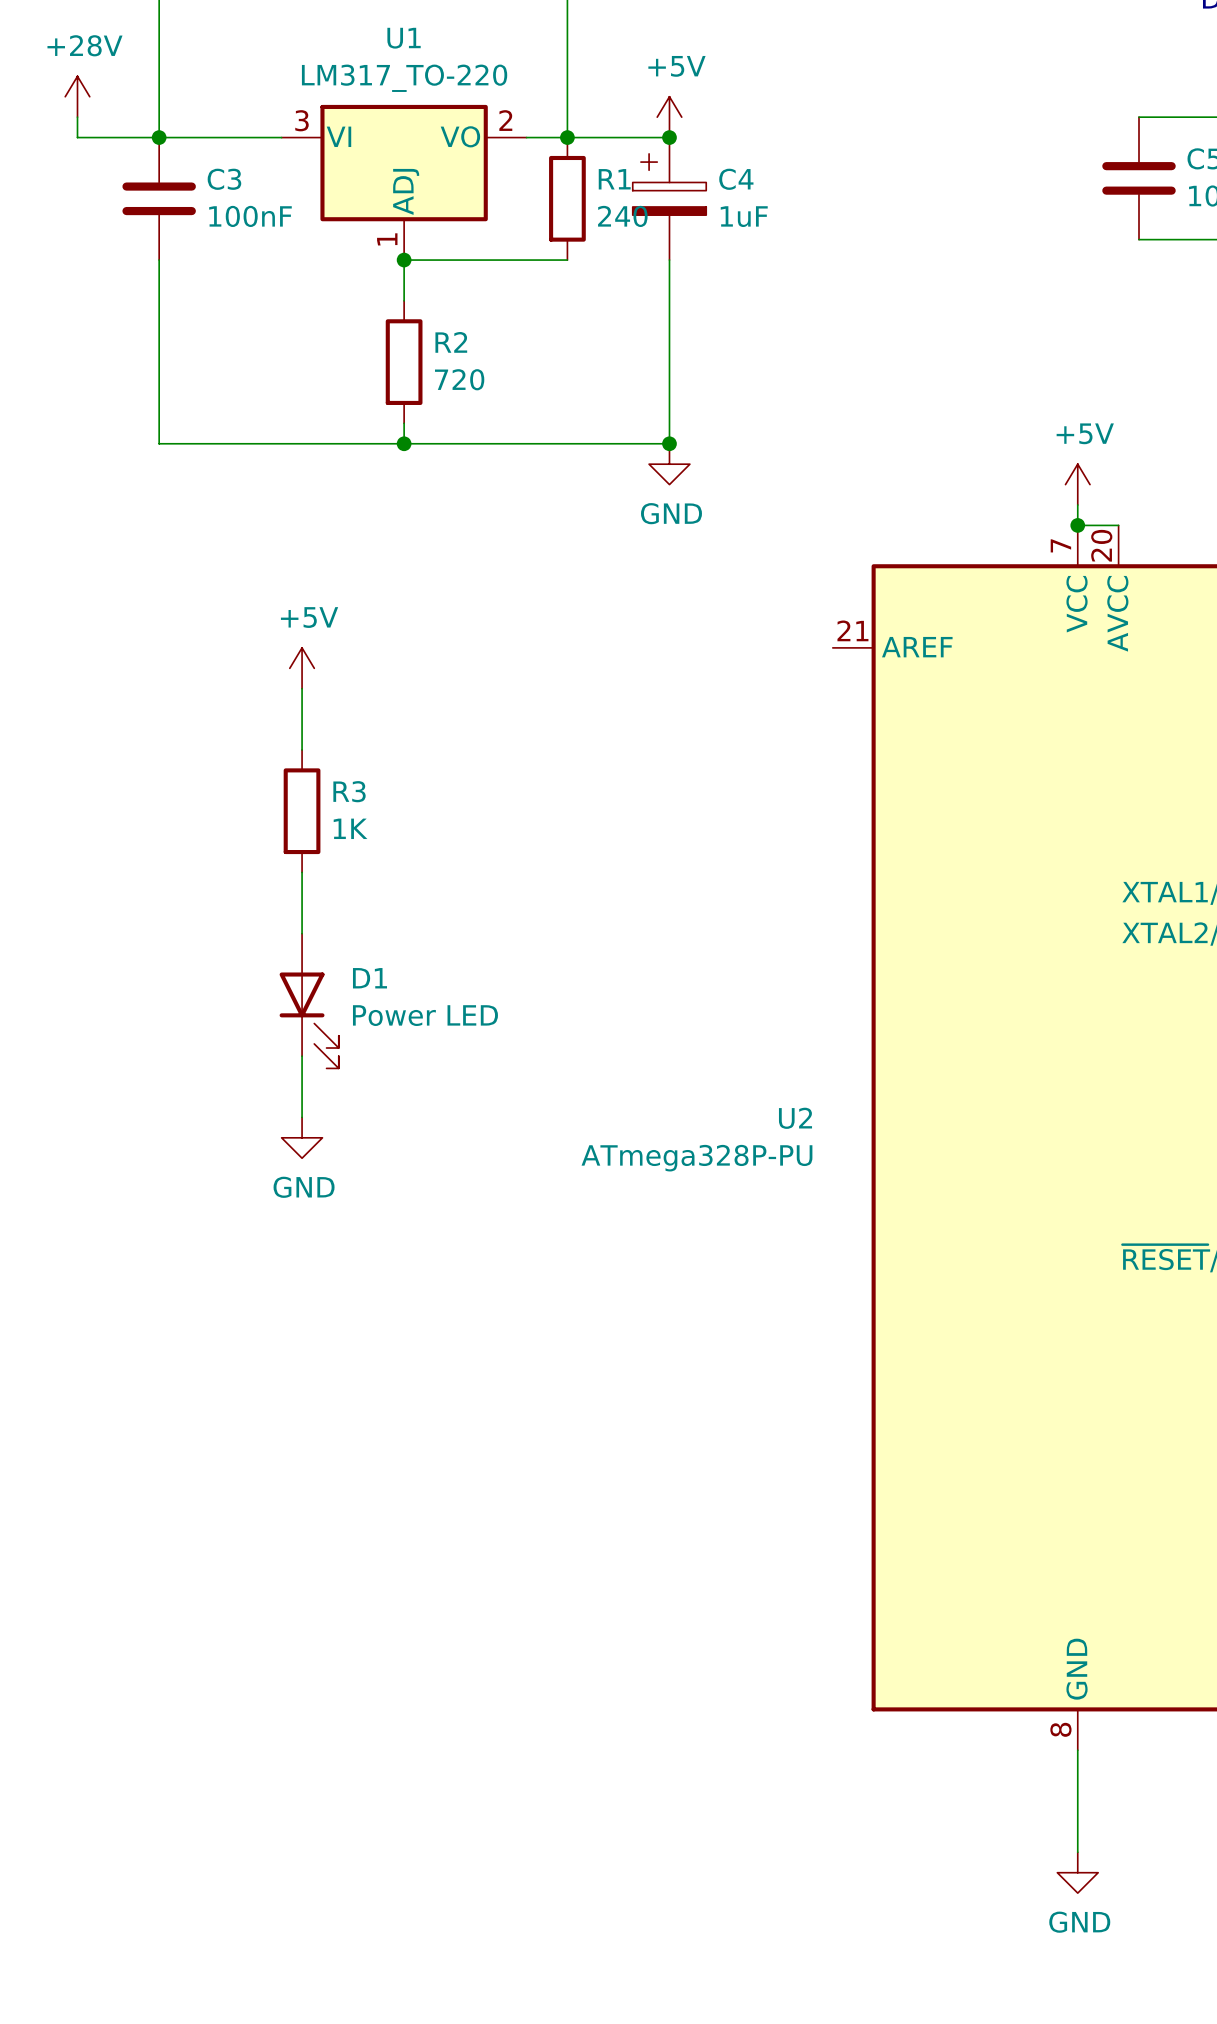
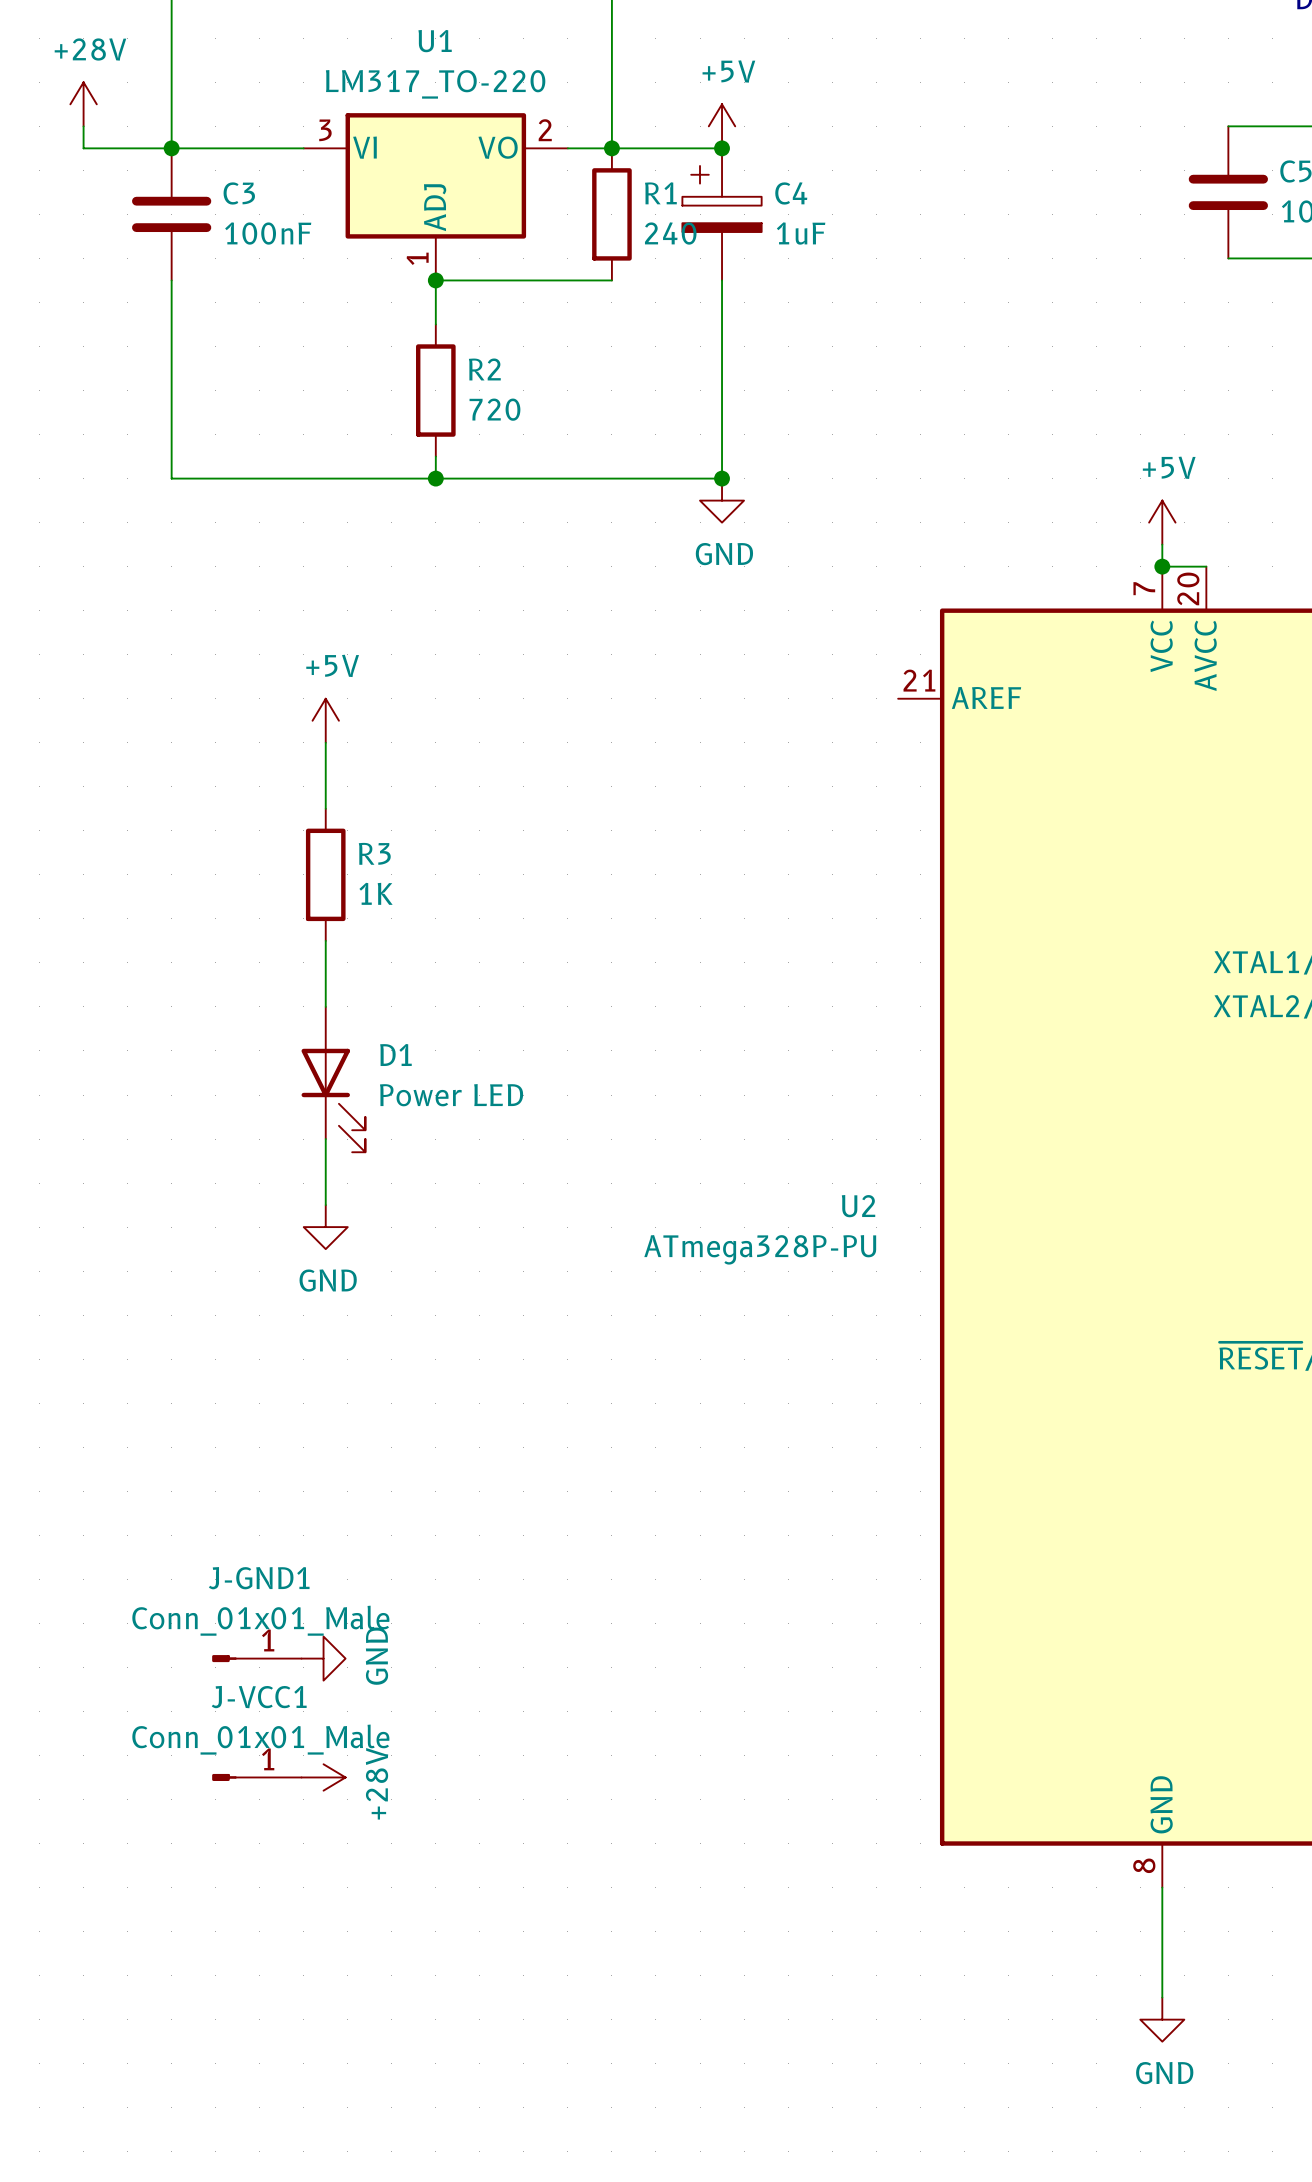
J-GND1: none -> Conn_01x01_Male (256, 1658)
power symbol: none -> GND (323, 1658)
J-VCC1: none -> Conn_01x01_Male (256, 1777)
power symbol: none -> +28V (323, 1777)

